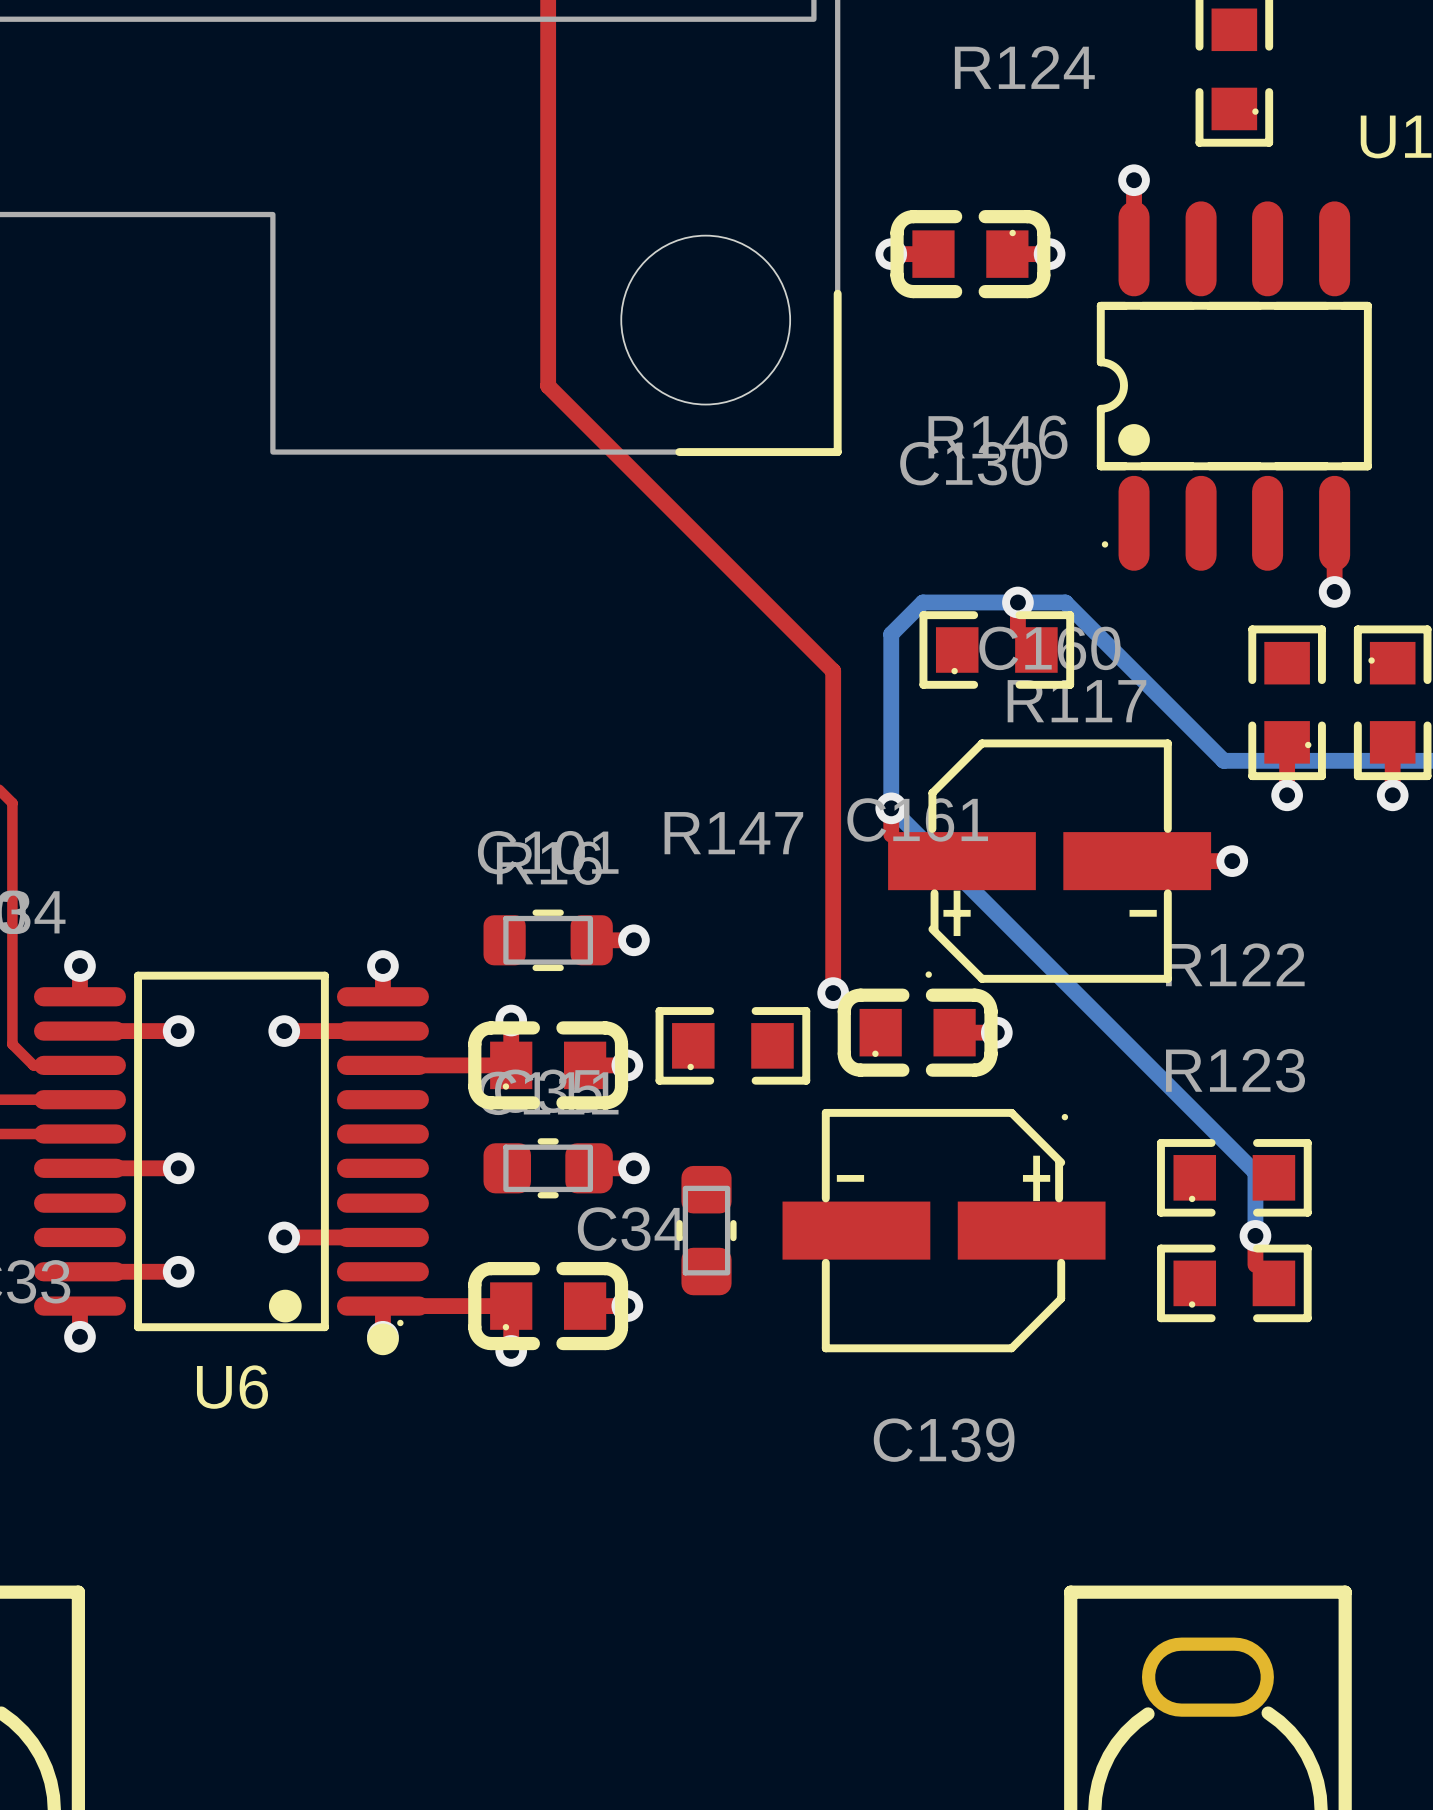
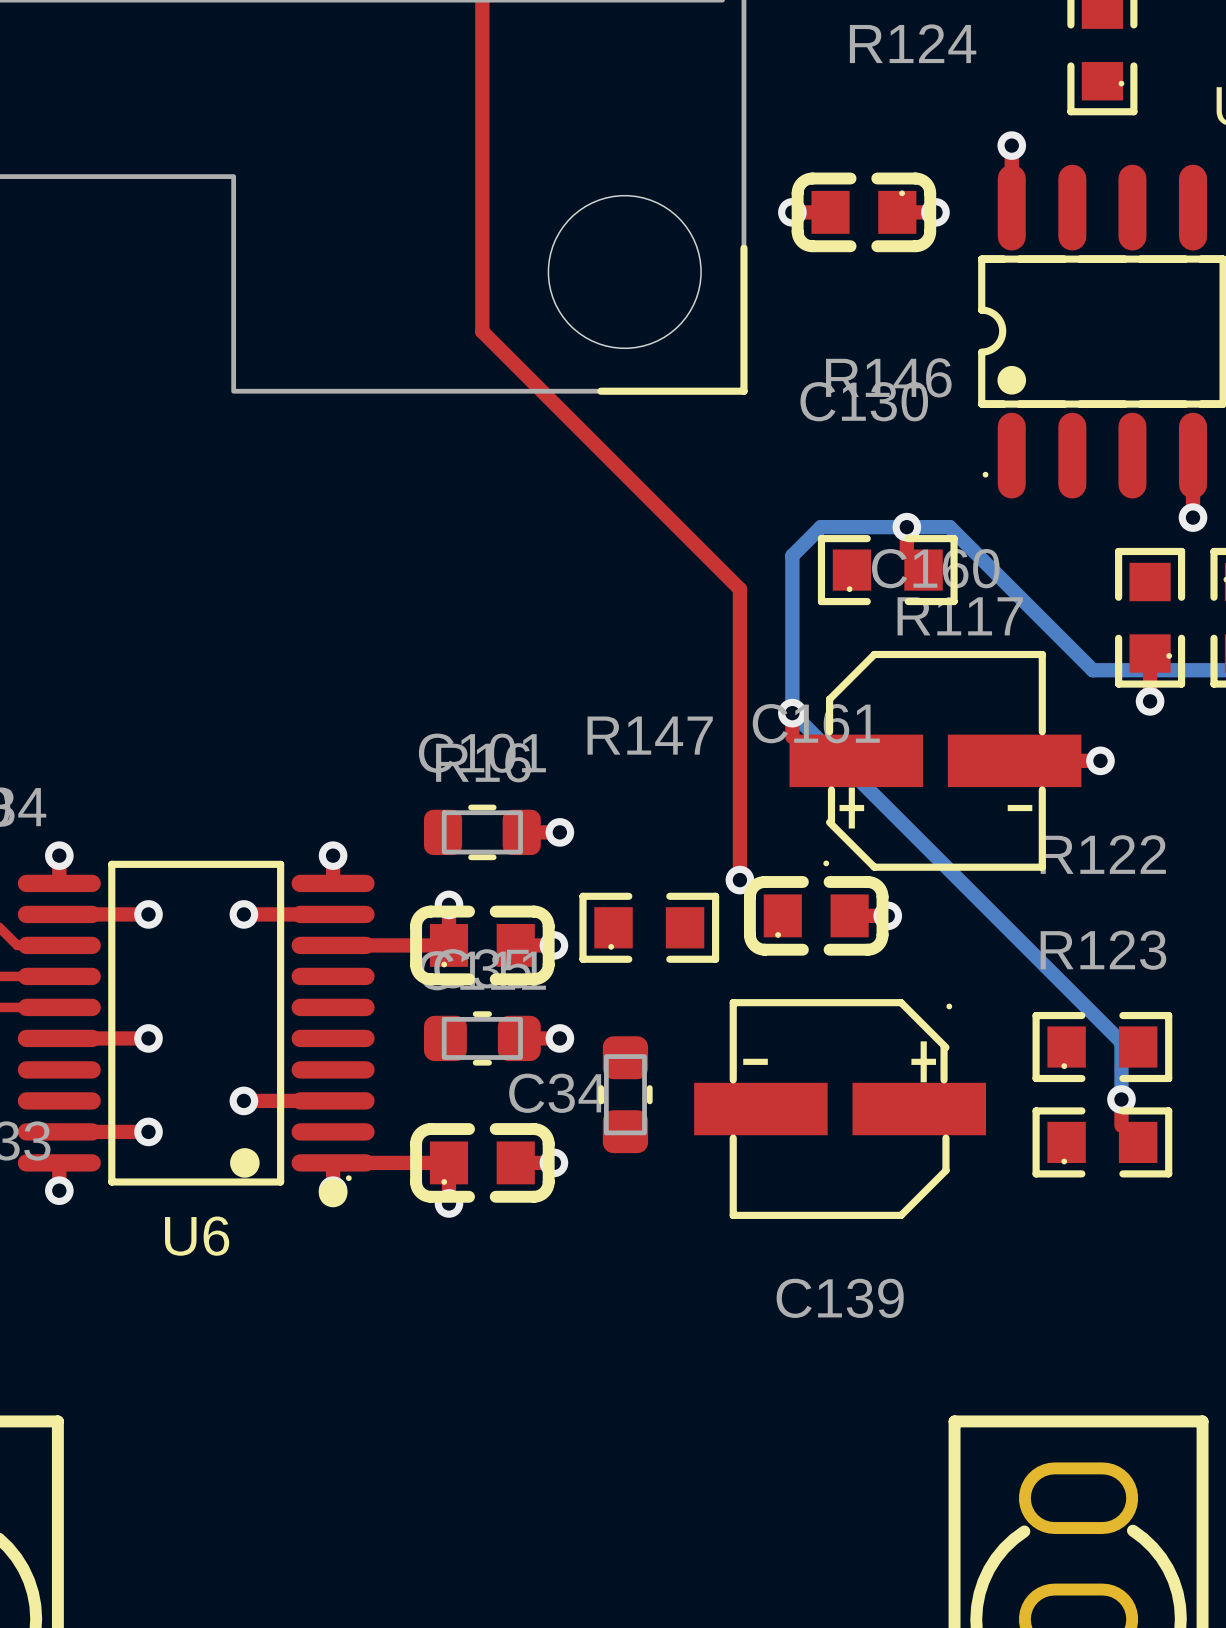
C139 position: (944, 1230) -> (840, 1109)

